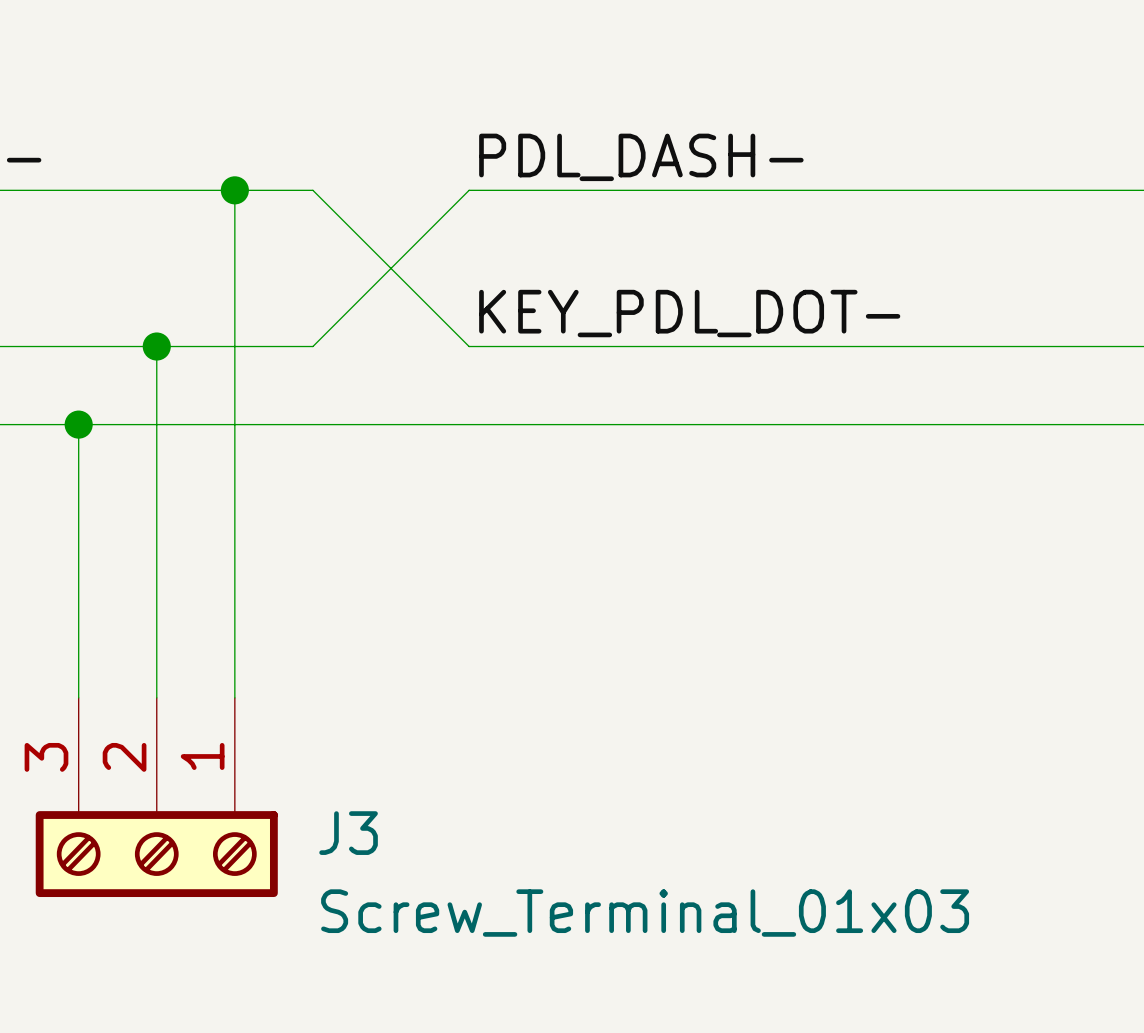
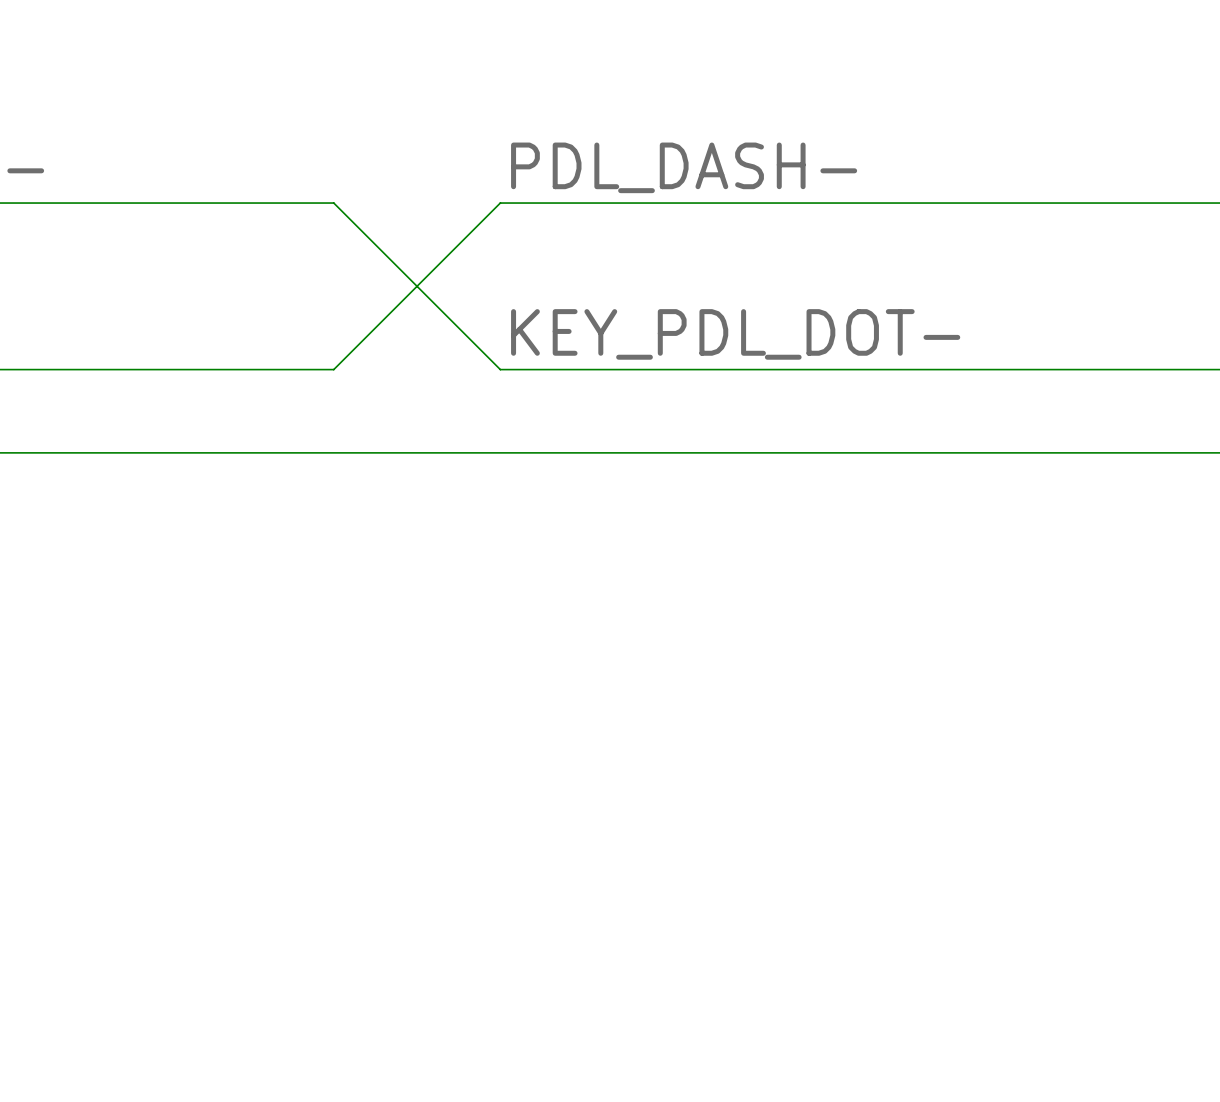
wire: (234, 190) (234, 697) -> none
junction: (234, 190) -> none
wire: (156, 346) (156, 697) -> none
junction: (156, 346) -> none
wire: (78, 424) (78, 697) -> none
junction: (78, 424) -> none
J3: Screw_Terminal_01x03 (156, 797) -> none

